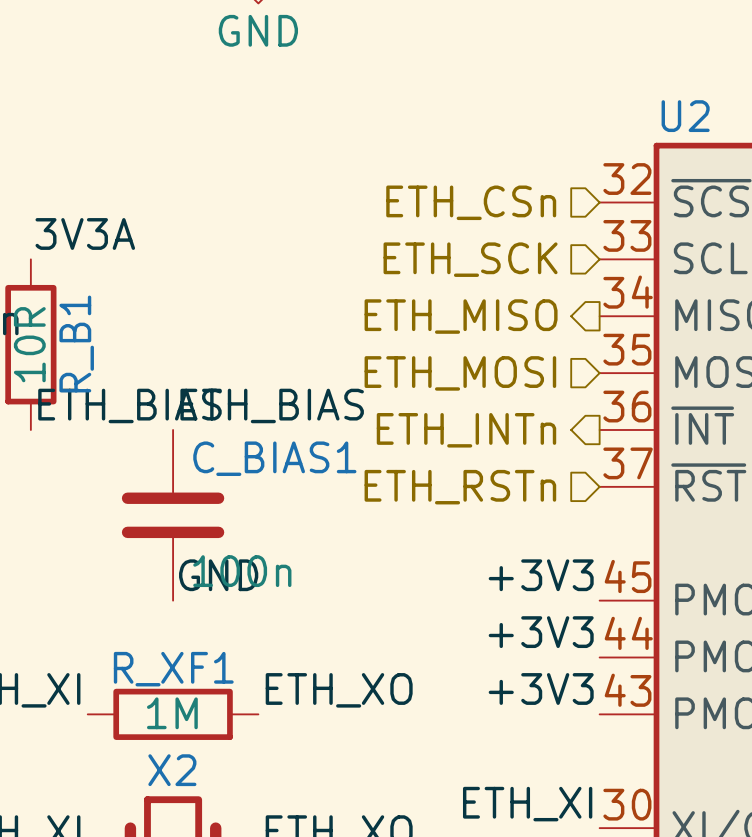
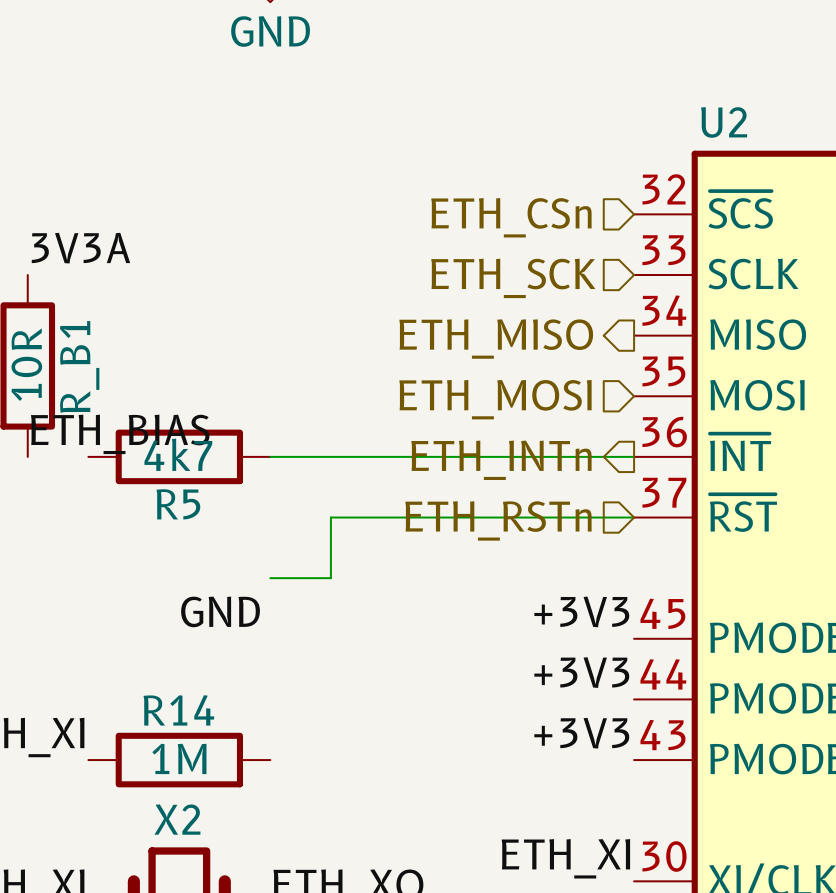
label: ETH_BIAS (272, 405) -> none
R5: none -> 4k7 (179, 456)
wire: none -> (270, 456) (634, 456)
wire: none -> (634, 517) (330, 517) (330, 578) (270, 578)
C_BIAS1: 100n (173, 515) -> none
R_XF1 name: R_XF1 (173, 669) -> R14 (178, 710)
label: ETH_XO (339, 690) -> none

